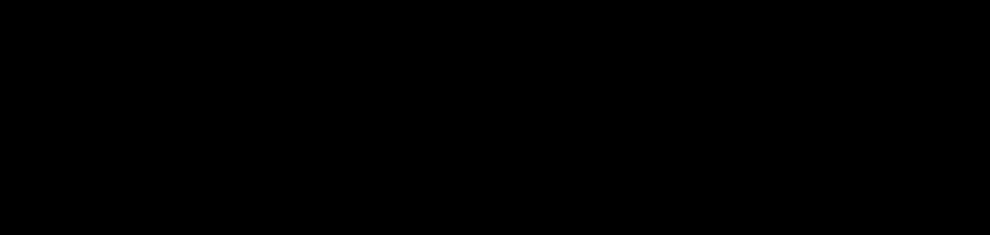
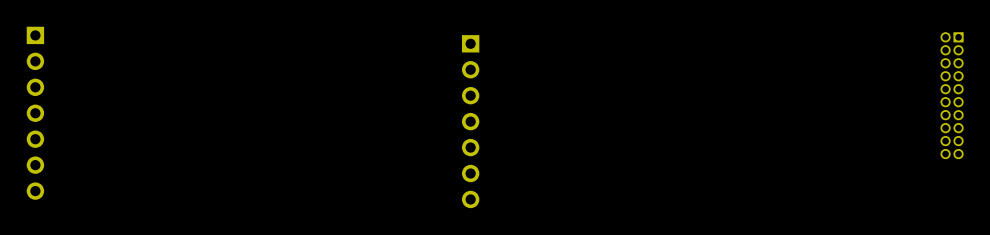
part: none -> (952, 95)
part: none -> (35, 113)
part: none -> (470, 121)

